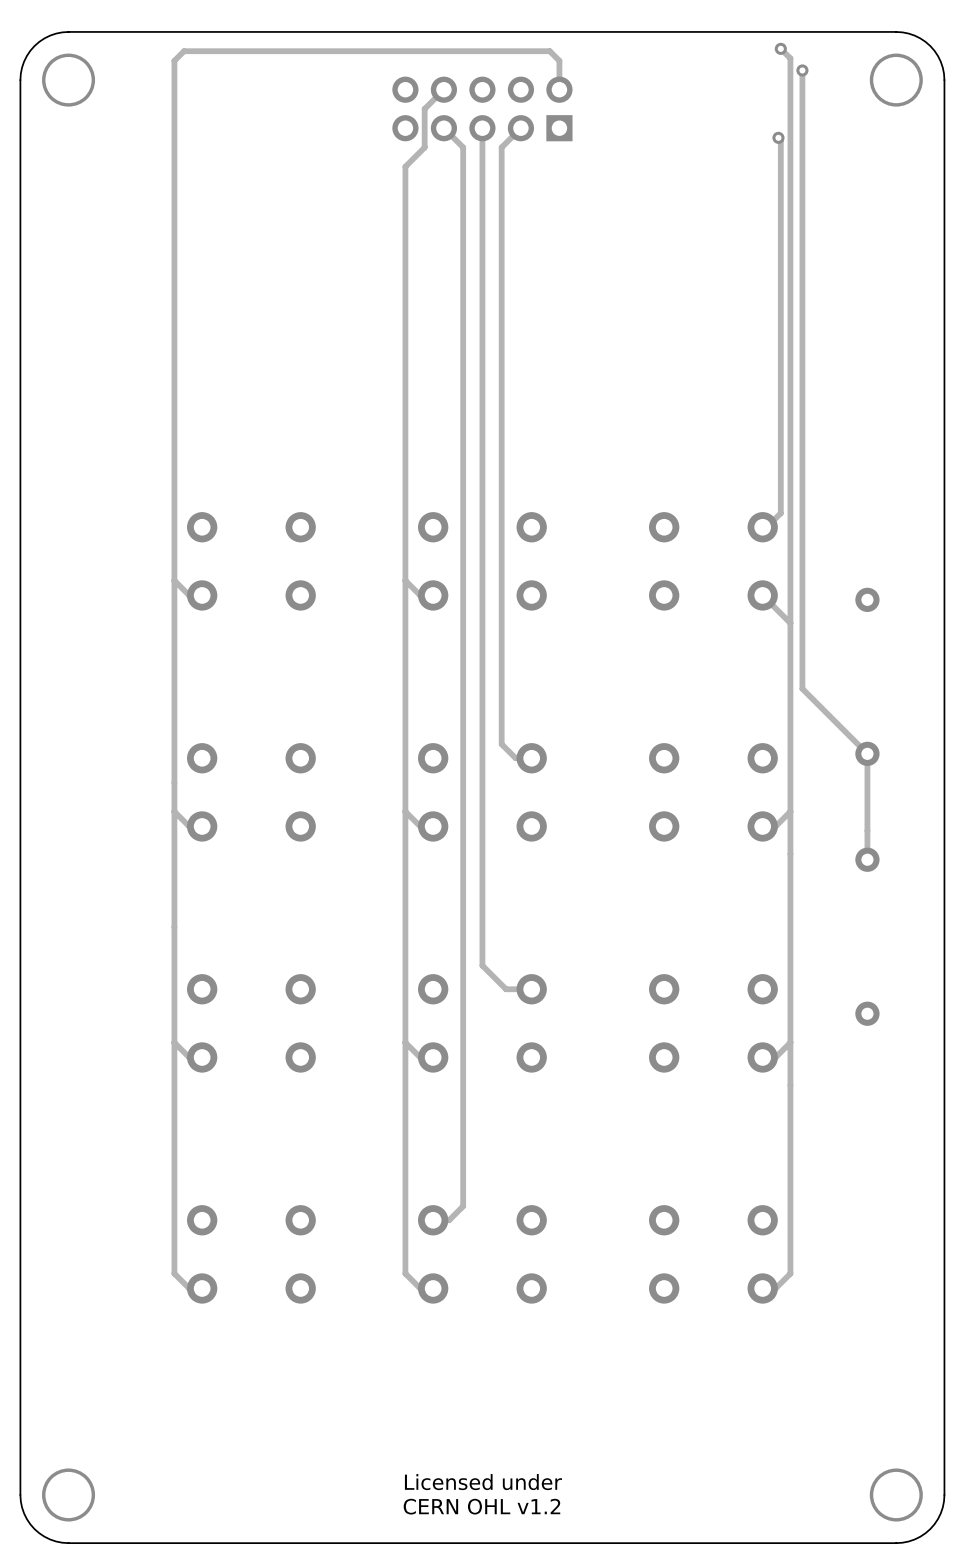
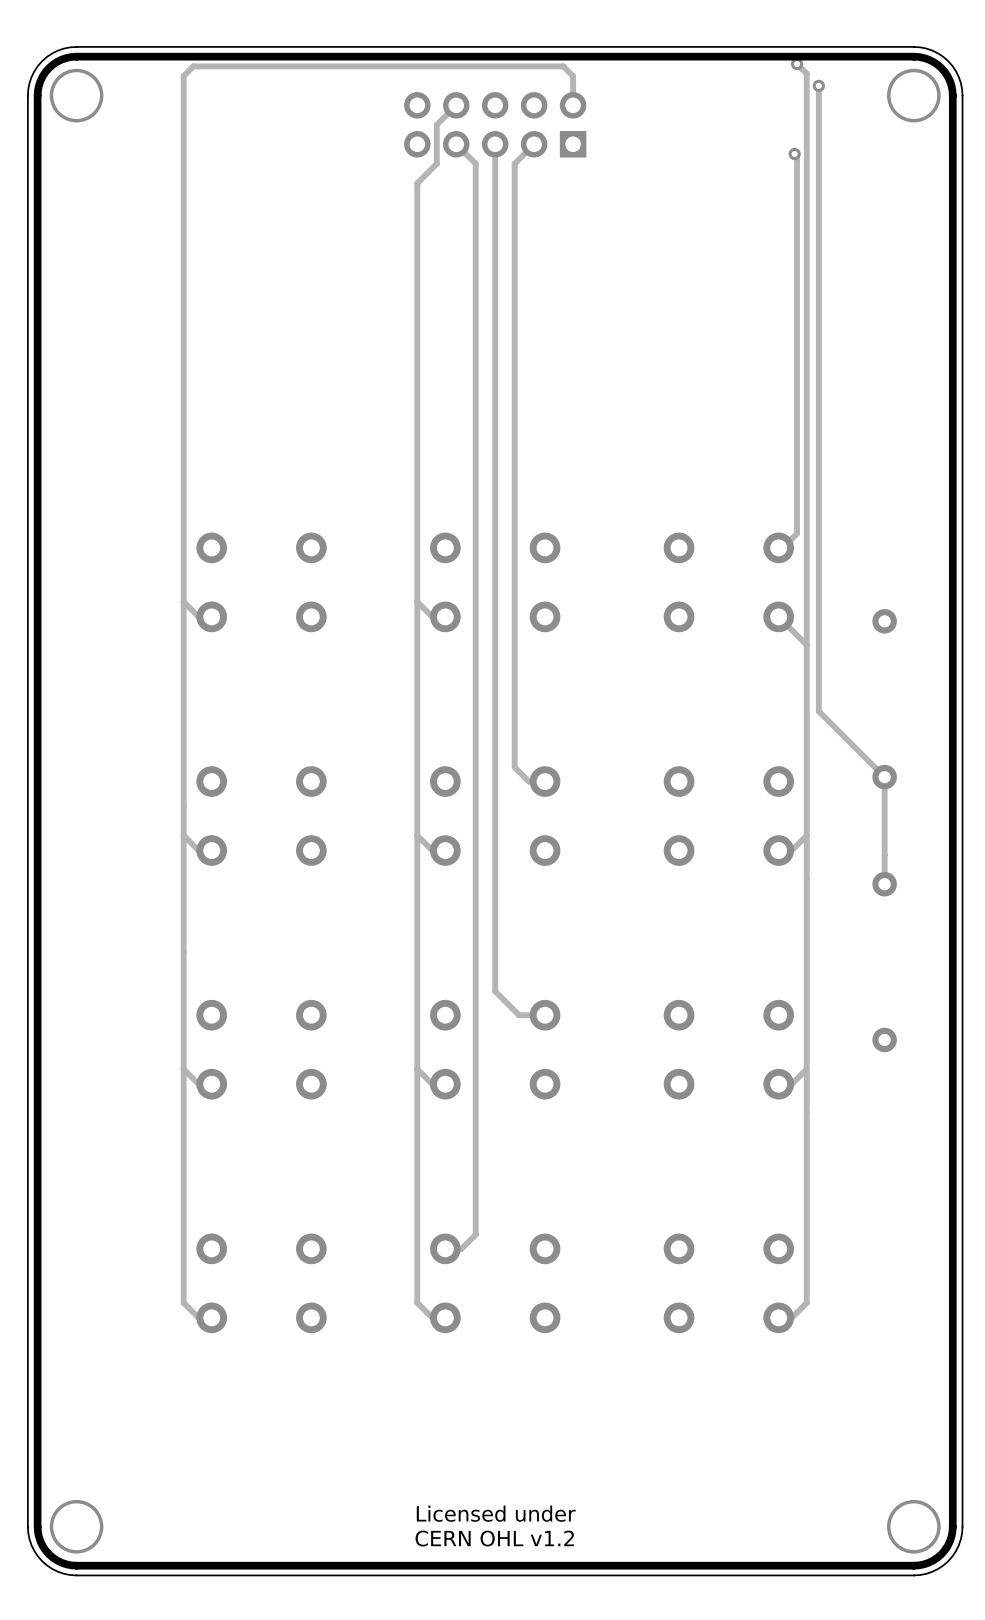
line: none -> (913, 56) (76, 56) (57, 61) (42, 76) (37, 95) (37, 1526) (42, 1546) (57, 1560) (76, 1565) (913, 1565) (933, 1560) (947, 1546) (952, 1526) (952, 95) (949, 80) (941, 68) (928, 59) (913, 56)

